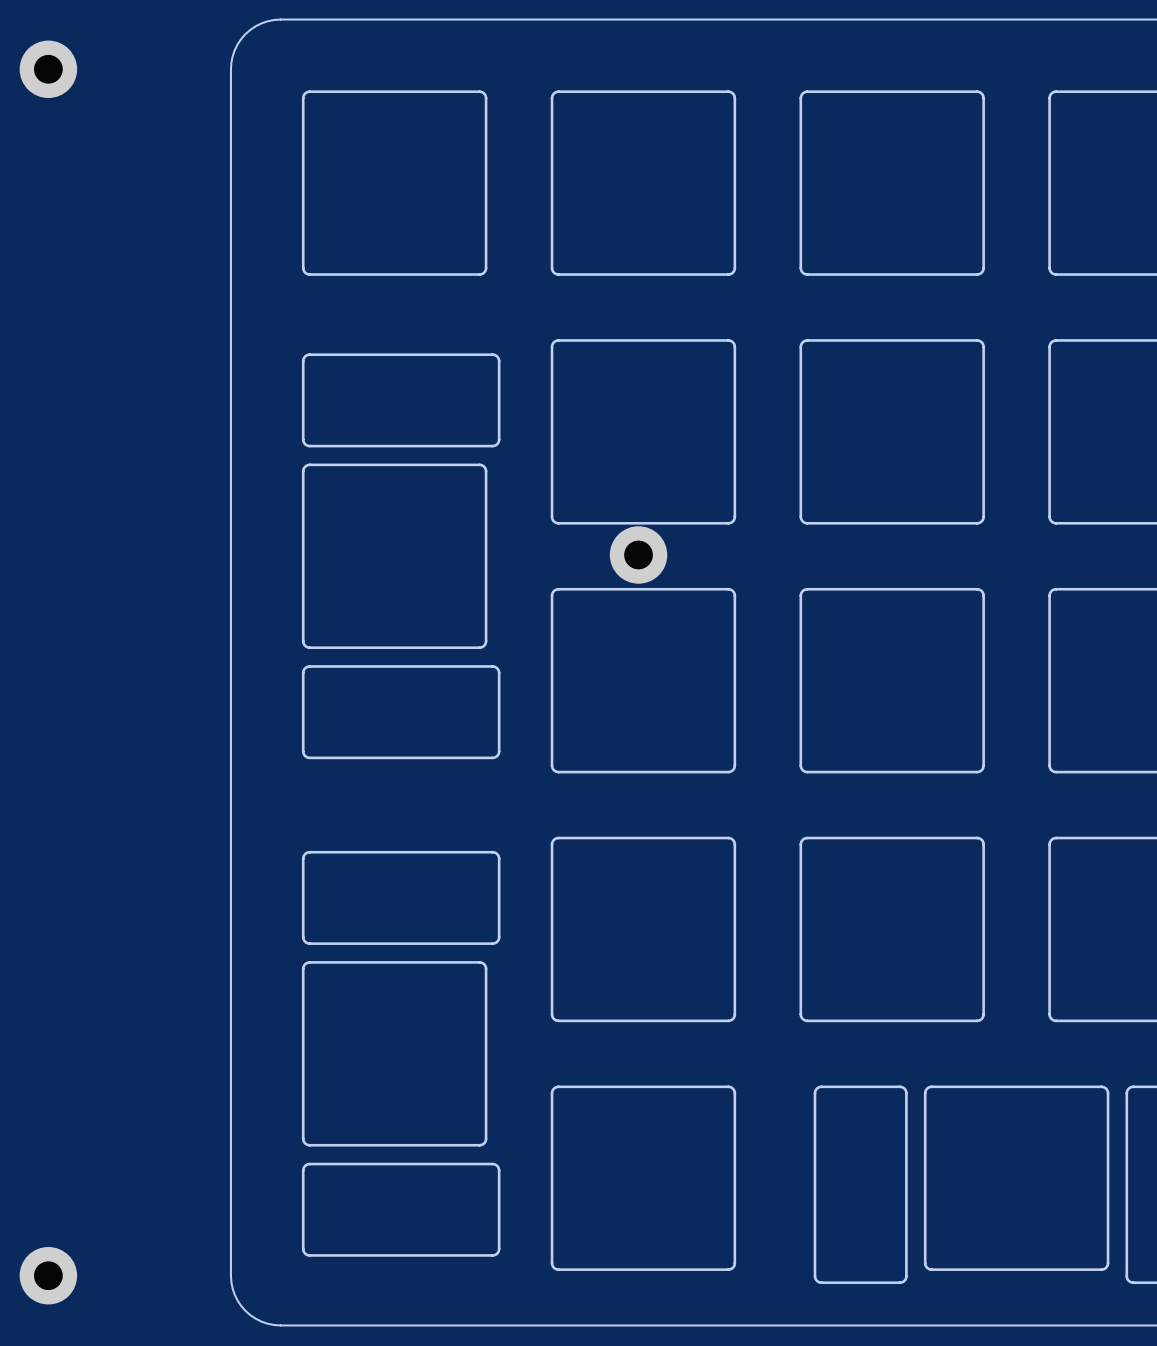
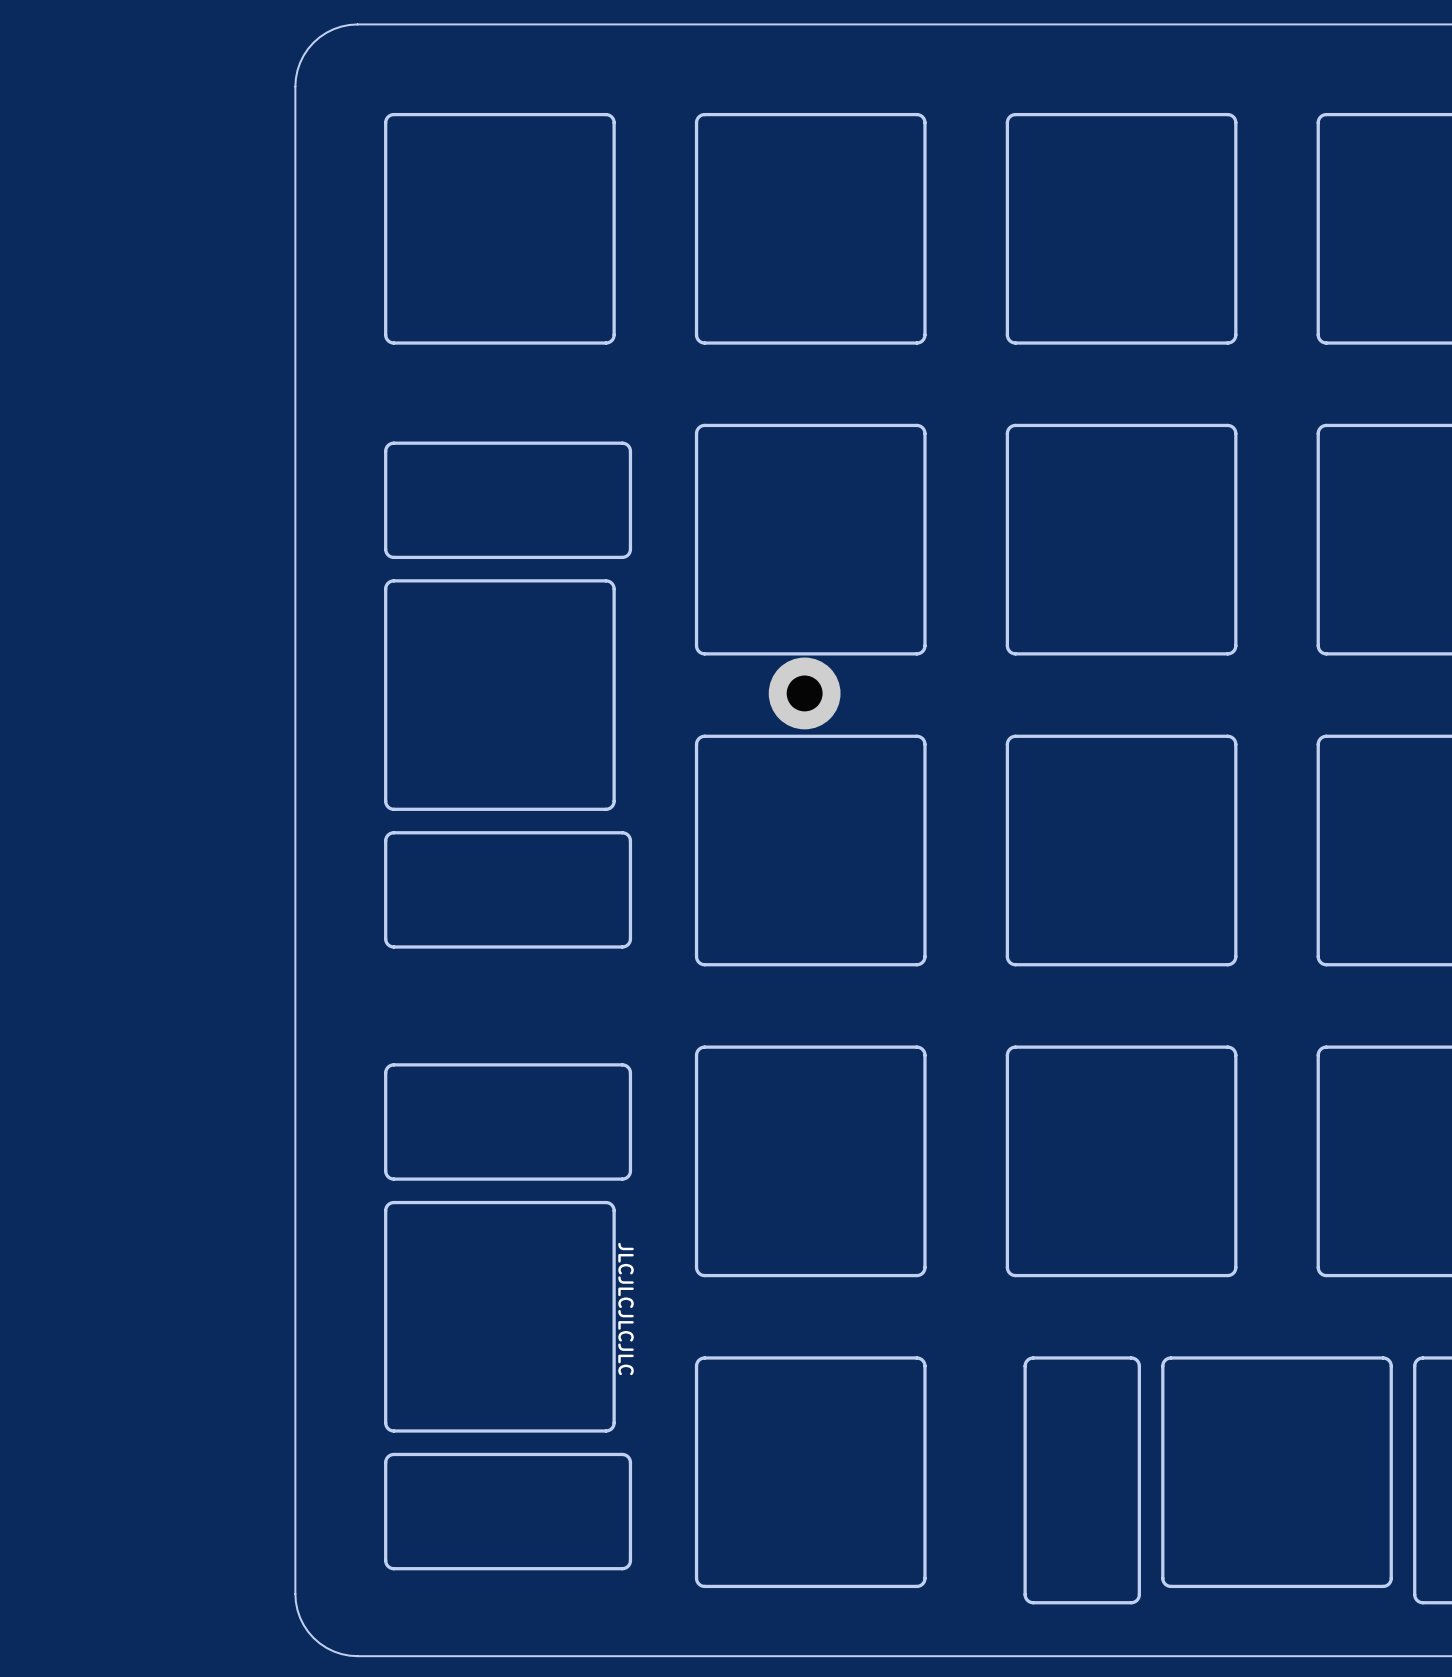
part: (48, 69) -> none
text: none -> JLCJLCJLCJLC (626, 1308)
part: (48, 1275) -> none

